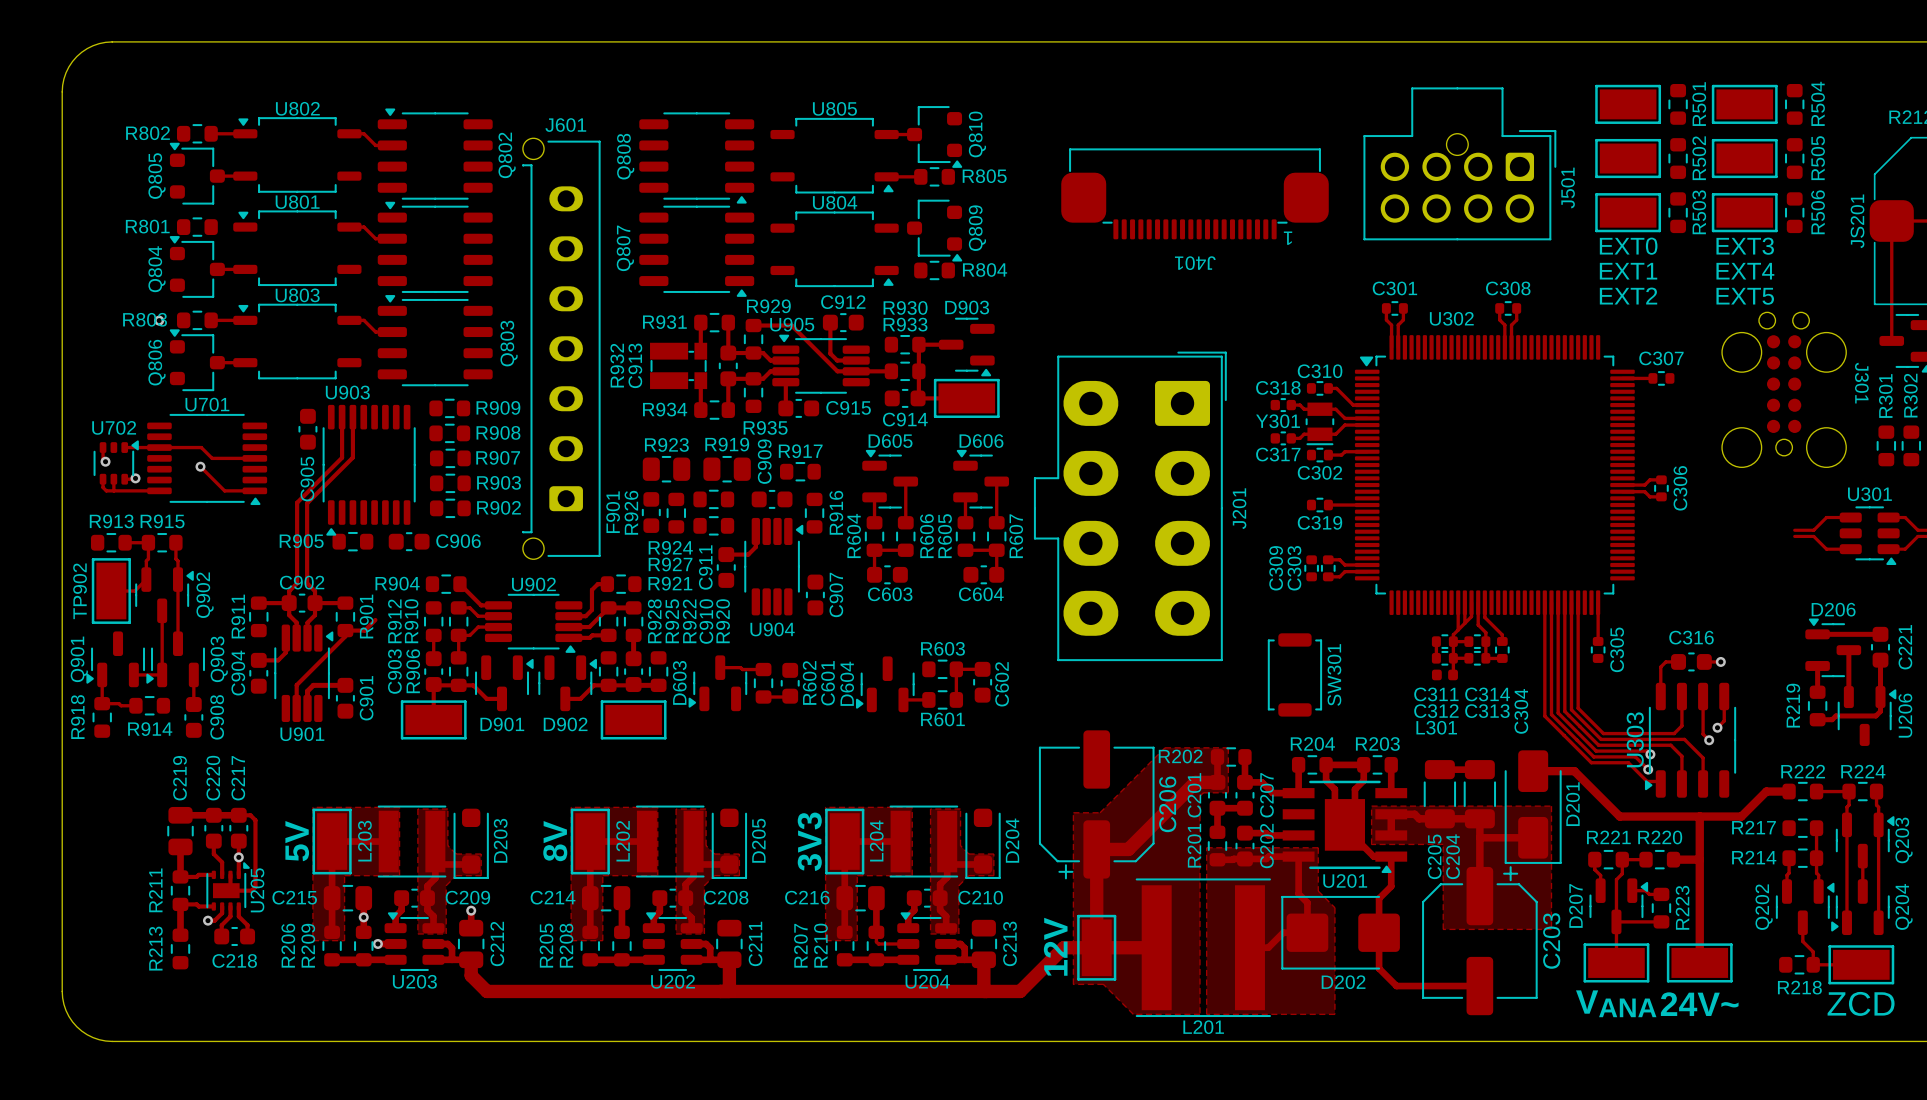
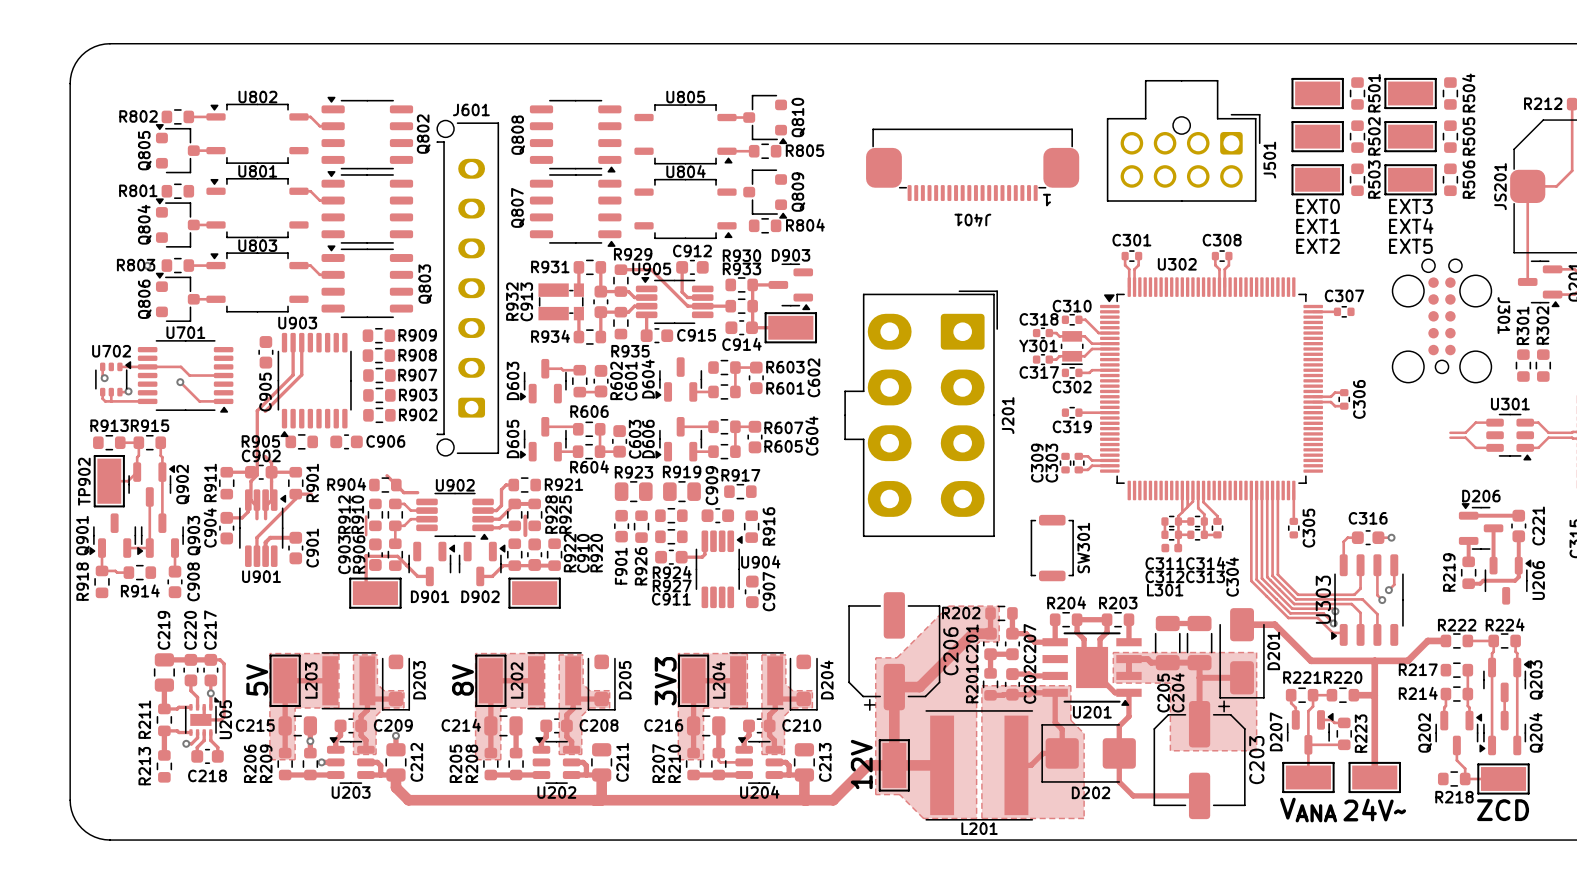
R923 position: (666, 469) -> (633, 491)
R919 position: (727, 469) -> (681, 491)
R917 position: (800, 471) -> (740, 491)
track: none -> (579, 392) (600, 392)
track: none -> (693, 391) (713, 391)
D605 rotation: 0° (890, 479) -> 90° counterclockwise (543, 439)
D605 position: (890, 479) -> (543, 439)
D606 rotation: 0° (981, 479) -> 90° counterclockwise (678, 439)
D606 position: (981, 479) -> (678, 439)
track: (905, 481) (905, 522) -> none
track: (996, 481) (996, 522) -> none
track: (874, 497) (874, 522) -> none
track: (965, 497) (965, 522) -> none
R924 position: (713, 499) -> (671, 515)
C909 position: (772, 499) -> (717, 515)
track: (307, 503) (307, 583) (315, 591) -> (265, 456) (271, 462) (271, 481)
F901 name position: F901 (613, 512) -> F901 (621, 566)
R926 name position: R926 (631, 512) -> R926 (641, 566)
F901 position: (651, 512) -> (621, 526)
R926 position: (676, 513) -> (641, 526)
R916 position: (814, 513) -> (751, 526)
track: none -> (545, 426) (578, 426)
track: none -> (600, 426) (600, 451) (619, 451)
track: none -> (680, 426) (713, 426)
track: none -> (754, 426) (735, 426) (735, 451)
track: (755, 531) (755, 547) (748, 554) (726, 554) -> none
R604 rotation: 0° (874, 536) -> 90° clockwise (589, 451)
R604 position: (874, 536) -> (589, 451)
R606: (905, 536) -> none
R605 name position: R605 (945, 536) -> R605 (783, 446)
R605 rotation: 0° (965, 536) -> 90° clockwise (724, 451)
R605 position: (965, 536) -> (724, 451)
R607 rotation: 0° (996, 536) -> 90° clockwise (724, 426)
R607 position: (996, 536) -> (724, 426)
R607 name position: R607 (1016, 536) -> R607 (783, 427)
R924 name position: R924 (670, 547) -> R924 (672, 572)
track: (905, 550) (874, 550) (874, 574) -> none
track: (965, 550) (996, 550) (996, 574) -> none
track: none -> (557, 451) (578, 451)
R927 name: R927 (670, 564) -> R606 (589, 411)
U904 position: (773, 566) -> (719, 569)
C911 name position: C911 (705, 567) -> C911 (671, 599)
C911 rotation: 0° (726, 567) -> 90° clockwise (671, 557)
C911 position: (726, 567) -> (671, 557)
C603 rotation: 0° (887, 574) -> 90° clockwise (619, 441)
C603 position: (887, 574) -> (619, 441)
C604 rotation: 0° (983, 574) -> 90° clockwise (754, 437)
C604 position: (983, 574) -> (754, 437)
R904 position: (446, 584) -> (385, 485)
track: (607, 584) (597, 584) (591, 589) (591, 609) (585, 616) (568, 616) -> (513, 485) (506, 485) (501, 489) (501, 505) (496, 510) (483, 510)
R921 position: (621, 584) -> (524, 485)
C907 position: (815, 594) -> (752, 591)
C604 name position: C604 (981, 594) -> C604 (811, 435)
track: (258, 603) (289, 603) -> (226, 472) (250, 472)
C902 position: (302, 603) -> (261, 472)
track: (315, 603) (345, 603) -> (271, 472) (295, 472)
track: none -> (311, 494) (295, 494) (295, 498) (256, 537) (256, 556)
track: (458, 607) (469, 607) (478, 616) (498, 616) -> (395, 503) (404, 503) (410, 510) (427, 510)
track: (633, 607) (608, 607) (589, 627) (568, 627) -> (534, 503) (514, 503) (499, 519) (483, 519)
R911 position: (258, 616) -> (226, 483)
R901 position: (345, 616) -> (295, 483)
track: (375, 619) (364, 630) (345, 630) (345, 636) (296, 685) (296, 708) -> none
R912 position: (433, 621) -> (375, 514)
R910 position: (458, 621) -> (395, 514)
R925 position: (608, 621) -> (514, 514)
R928 position: (633, 621) -> (534, 514)
R922 name position: R922 (689, 621) -> R922 (570, 553)
C910 name position: C910 (706, 621) -> C910 (583, 553)
R920 name position: R920 (723, 621) -> R920 (596, 553)
U902 position: (533, 623) -> (455, 516)
track: (498, 627) (478, 627) (469, 635) (458, 635) (458, 657) -> (427, 519) (410, 519) (404, 525) (395, 525) (395, 543)
U904 name position: U904 (772, 629) -> U904 (760, 562)
track: (608, 635) (568, 637) -> (514, 525) (483, 527)
track: (285, 638) (285, 652) (278, 660) (258, 660) -> (248, 500) (248, 511) (242, 517) (226, 517)
R603 name position: R603 (943, 648) -> R603 (785, 367)
R927: none -> (671, 536)
track: none -> (704, 541) (704, 554) (702, 557) (681, 557)
track: (720, 667) (763, 669) -> (545, 368) (579, 370)
R603 position: (942, 669) -> (724, 367)
track: (982, 669) (956, 669) (956, 699) -> (756, 367) (735, 367) (735, 391)
C903 position: (433, 671) -> (375, 554)
R906 position: (458, 671) -> (395, 554)
R922 position: (608, 671) -> (514, 554)
C910 position: (633, 671) -> (534, 554)
R920 position: (658, 671) -> (554, 554)
C904 position: (258, 673) -> (226, 528)
U901 position: (303, 673) -> (262, 528)
C602 position: (982, 682) -> (756, 377)
D901 position: (504, 683) -> (431, 563)
D902 position: (567, 683) -> (482, 563)
D603 position: (717, 683) -> (543, 381)
R602 position: (763, 683) -> (579, 381)
C601 position: (790, 683) -> (601, 381)
D604 position: (885, 684) -> (678, 379)
C602 name position: C602 (1002, 684) -> C602 (813, 377)
track: (345, 685) (313, 685) (307, 691) (307, 708) -> (295, 537) (270, 537) (265, 542) (265, 556)
track: (658, 685) (594, 685) (580, 698) (565, 698) -> (554, 565) (503, 565) (492, 576) (480, 576)
track: (790, 696) (763, 697) -> none
C901 position: (345, 698) -> (295, 548)
track: (486, 698) (502, 698) -> (408, 567) (417, 576) (429, 576)
track: (903, 699) (928, 699) -> (693, 451) (713, 451)
R601 position: (942, 699) -> (724, 391)
part position: (433, 719) -> (375, 593)
part position: (633, 719) -> (534, 593)
R601 name position: R601 (942, 719) -> R601 (785, 388)

